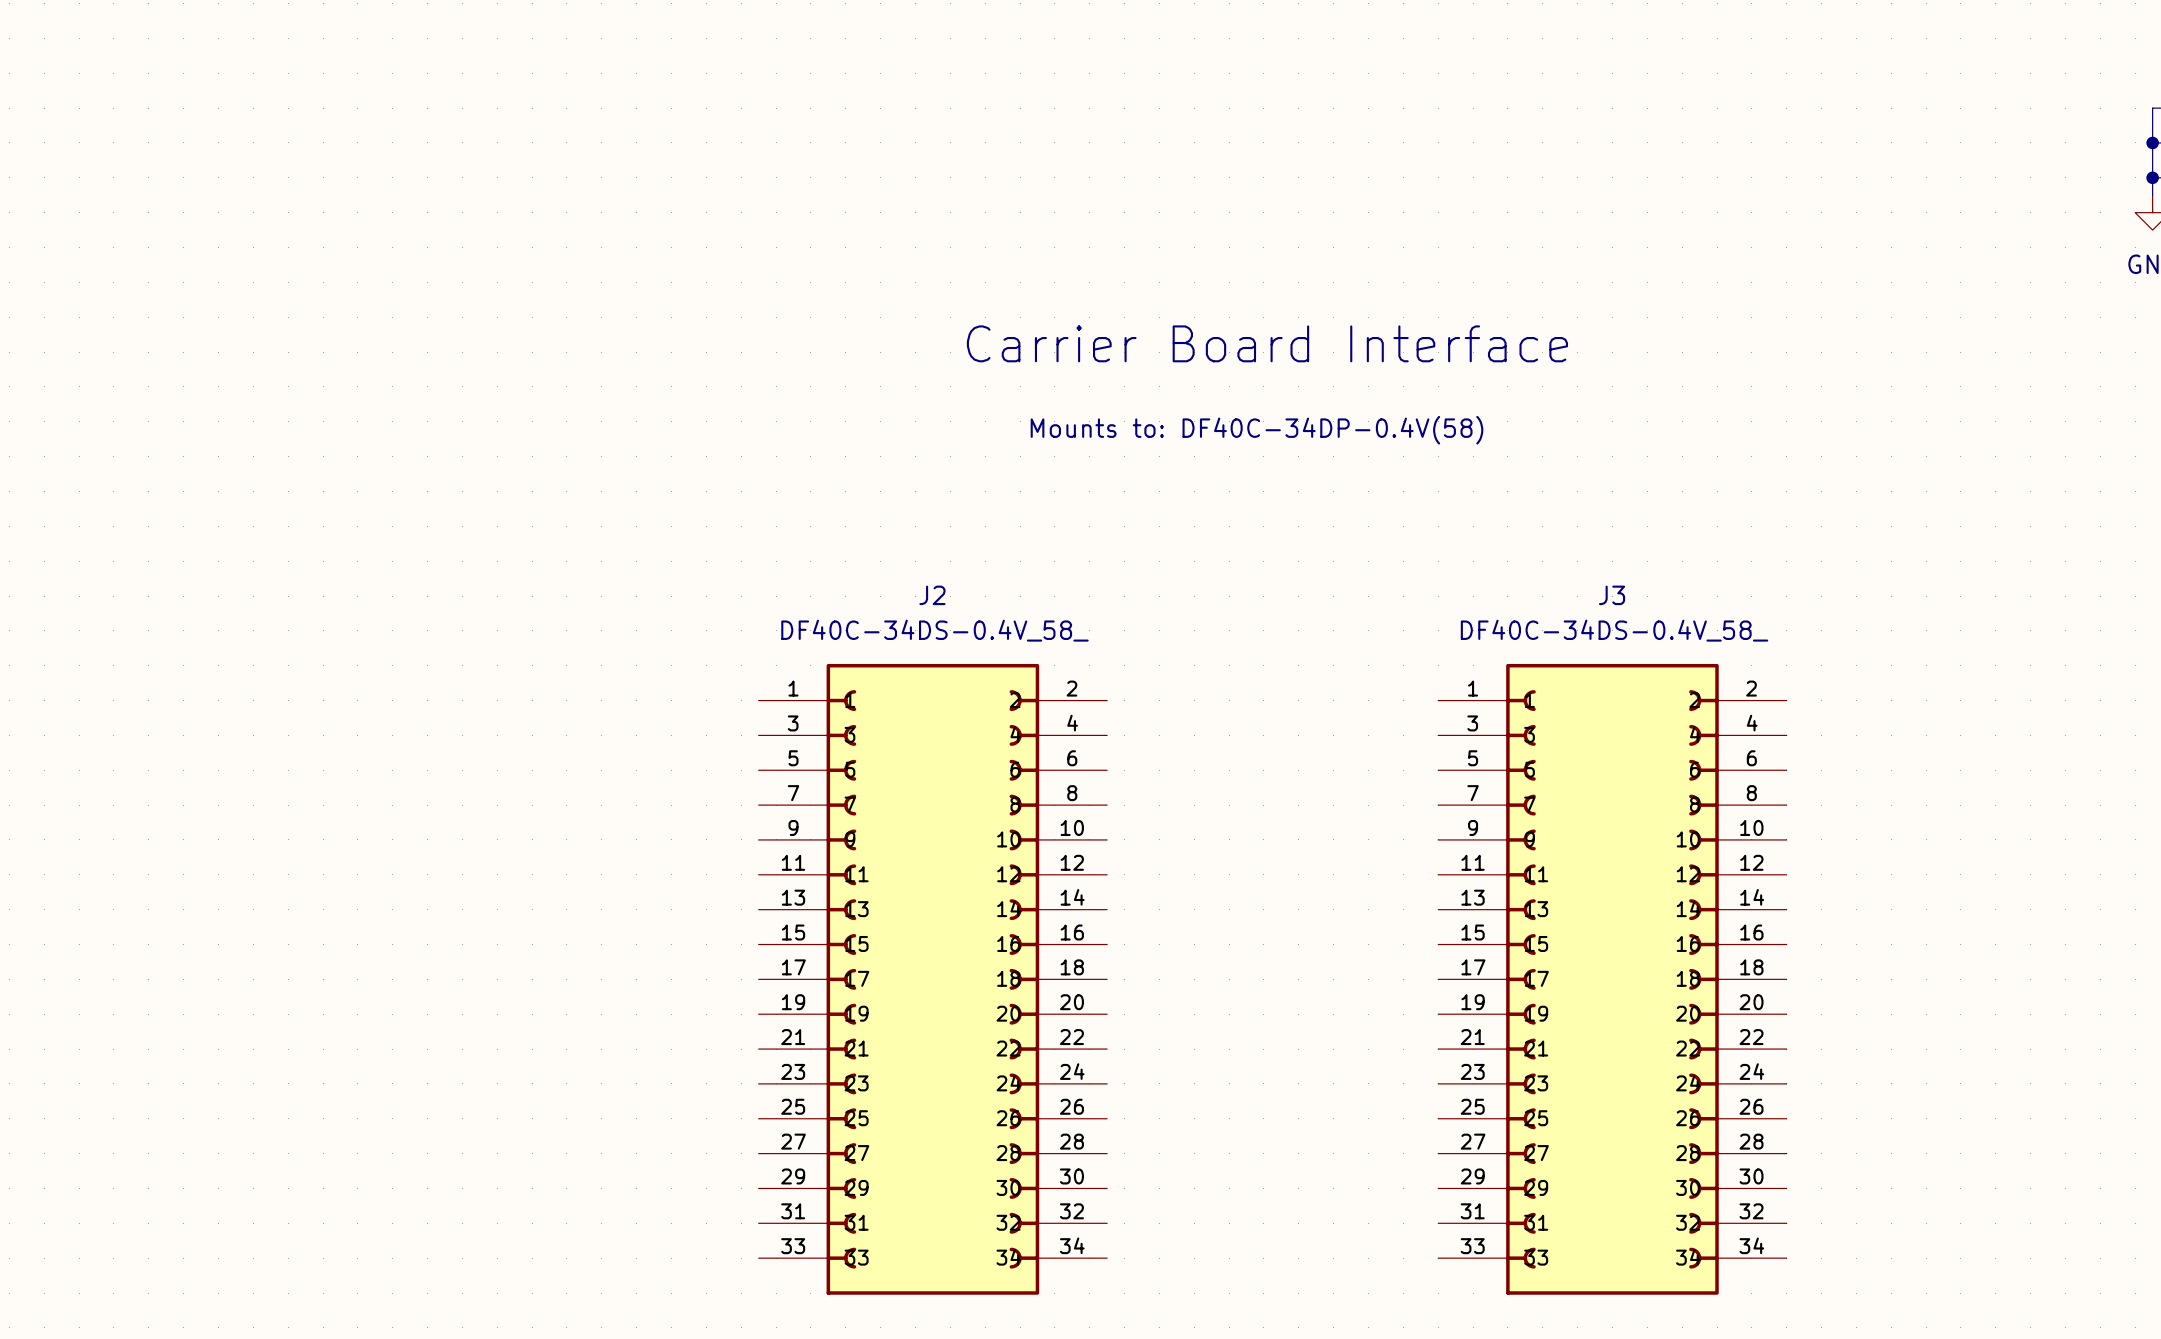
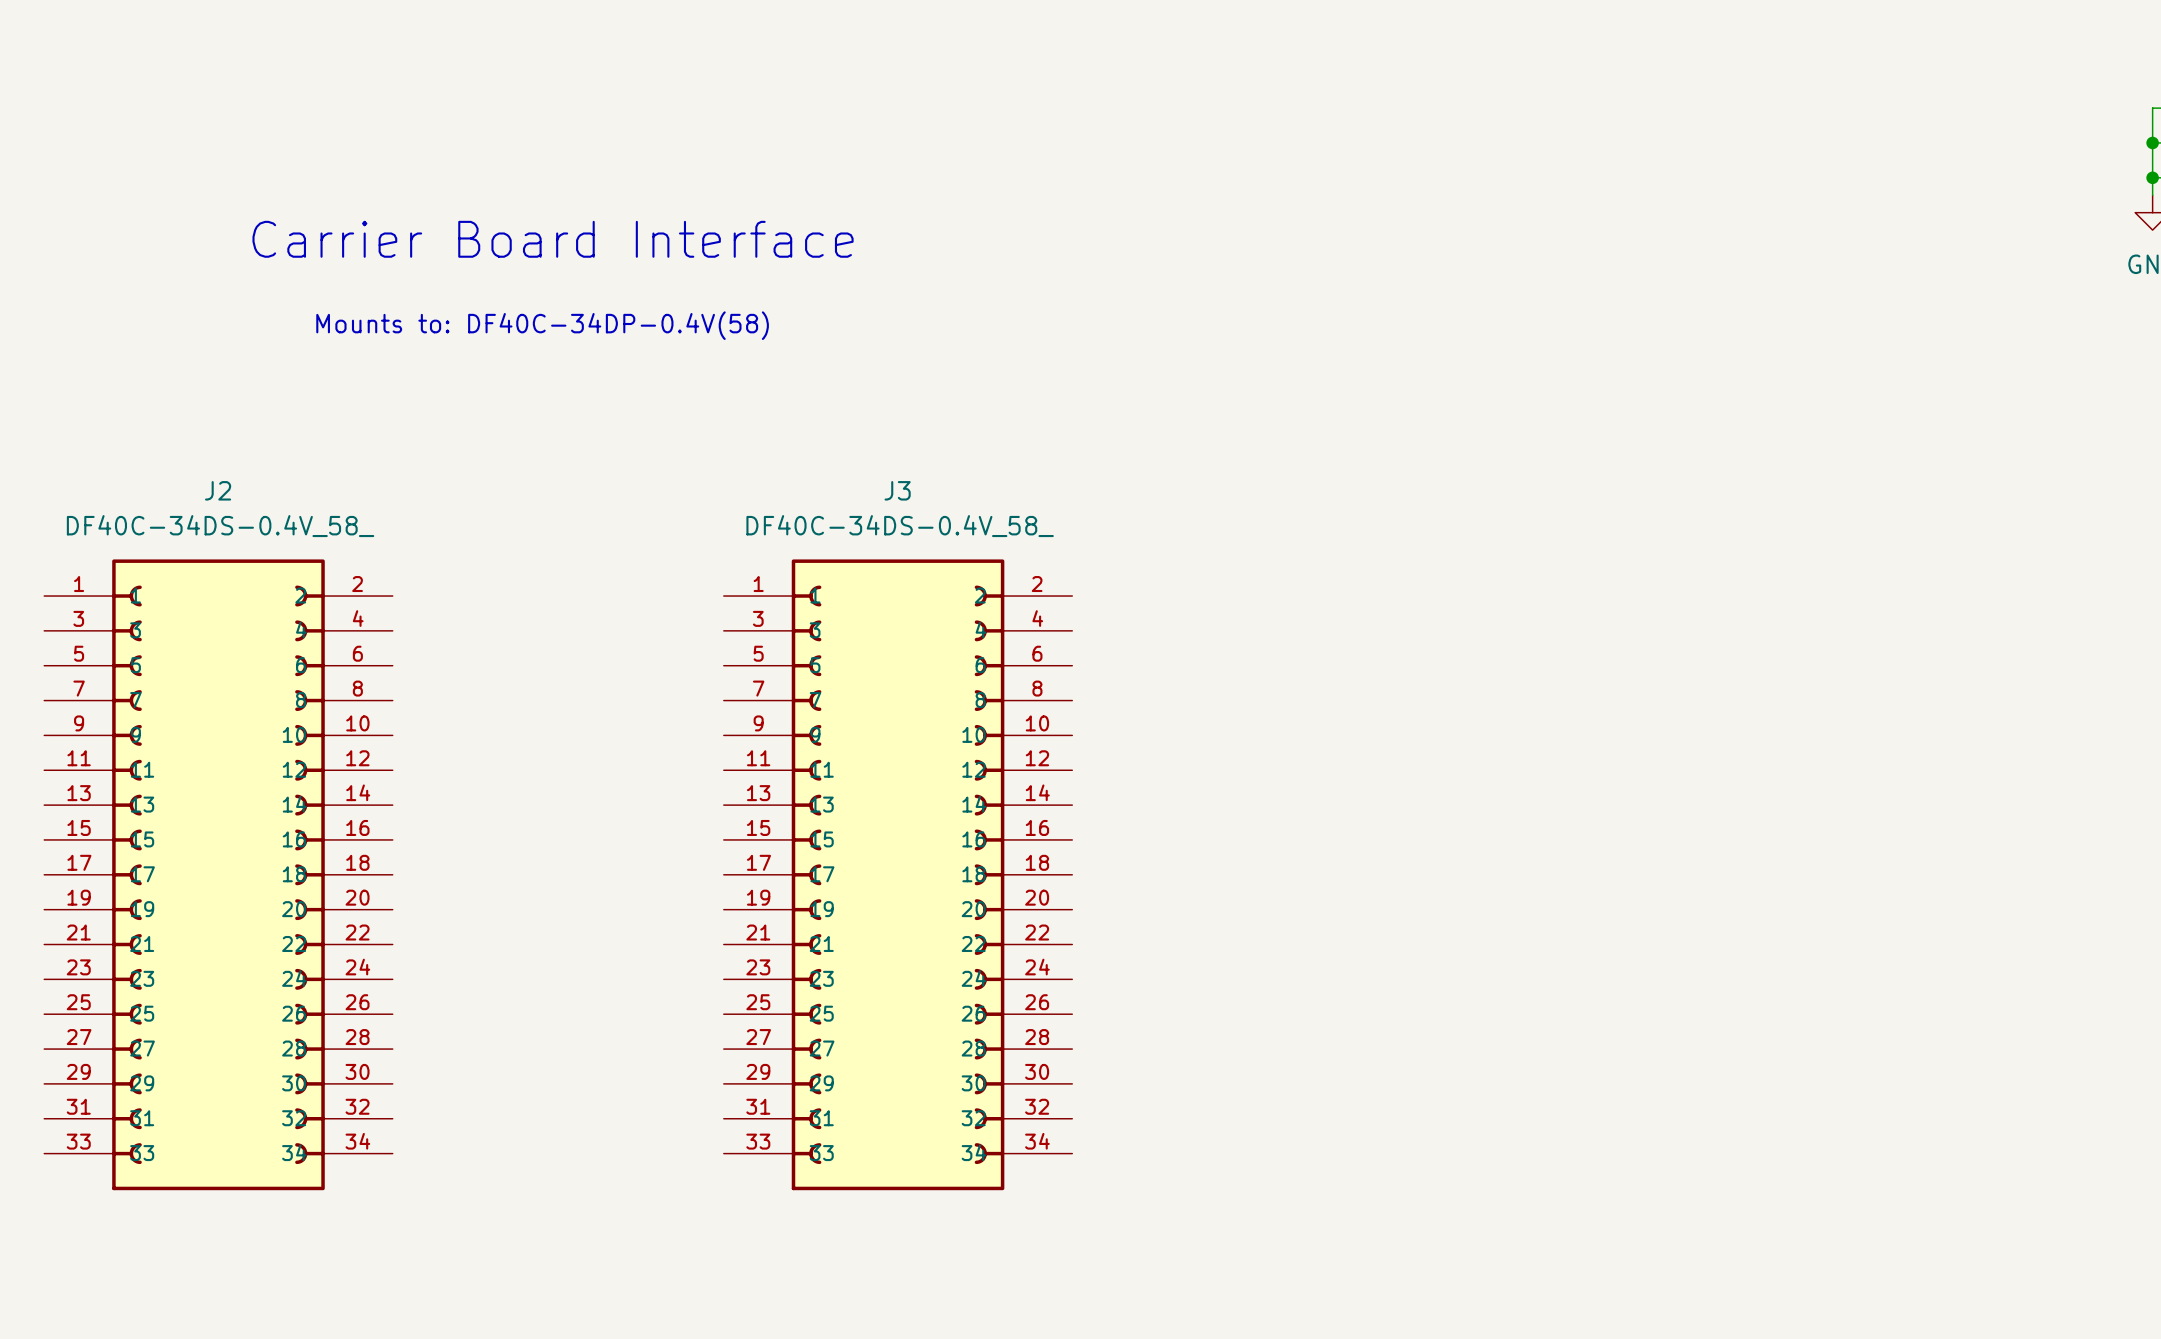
text: none -> Carrier Board Interface (553, 239)
text: none -> Mounts to: DF40C-34DP-0.4V(58) (542, 325)
text: Carrier Board Interface (1267, 343) -> none
text: Mounts to: DF40C-34DP-0.4V(58) (1256, 430) -> none
J2 position: (932, 979) -> (218, 874)
J3 position: (1612, 979) -> (898, 874)

